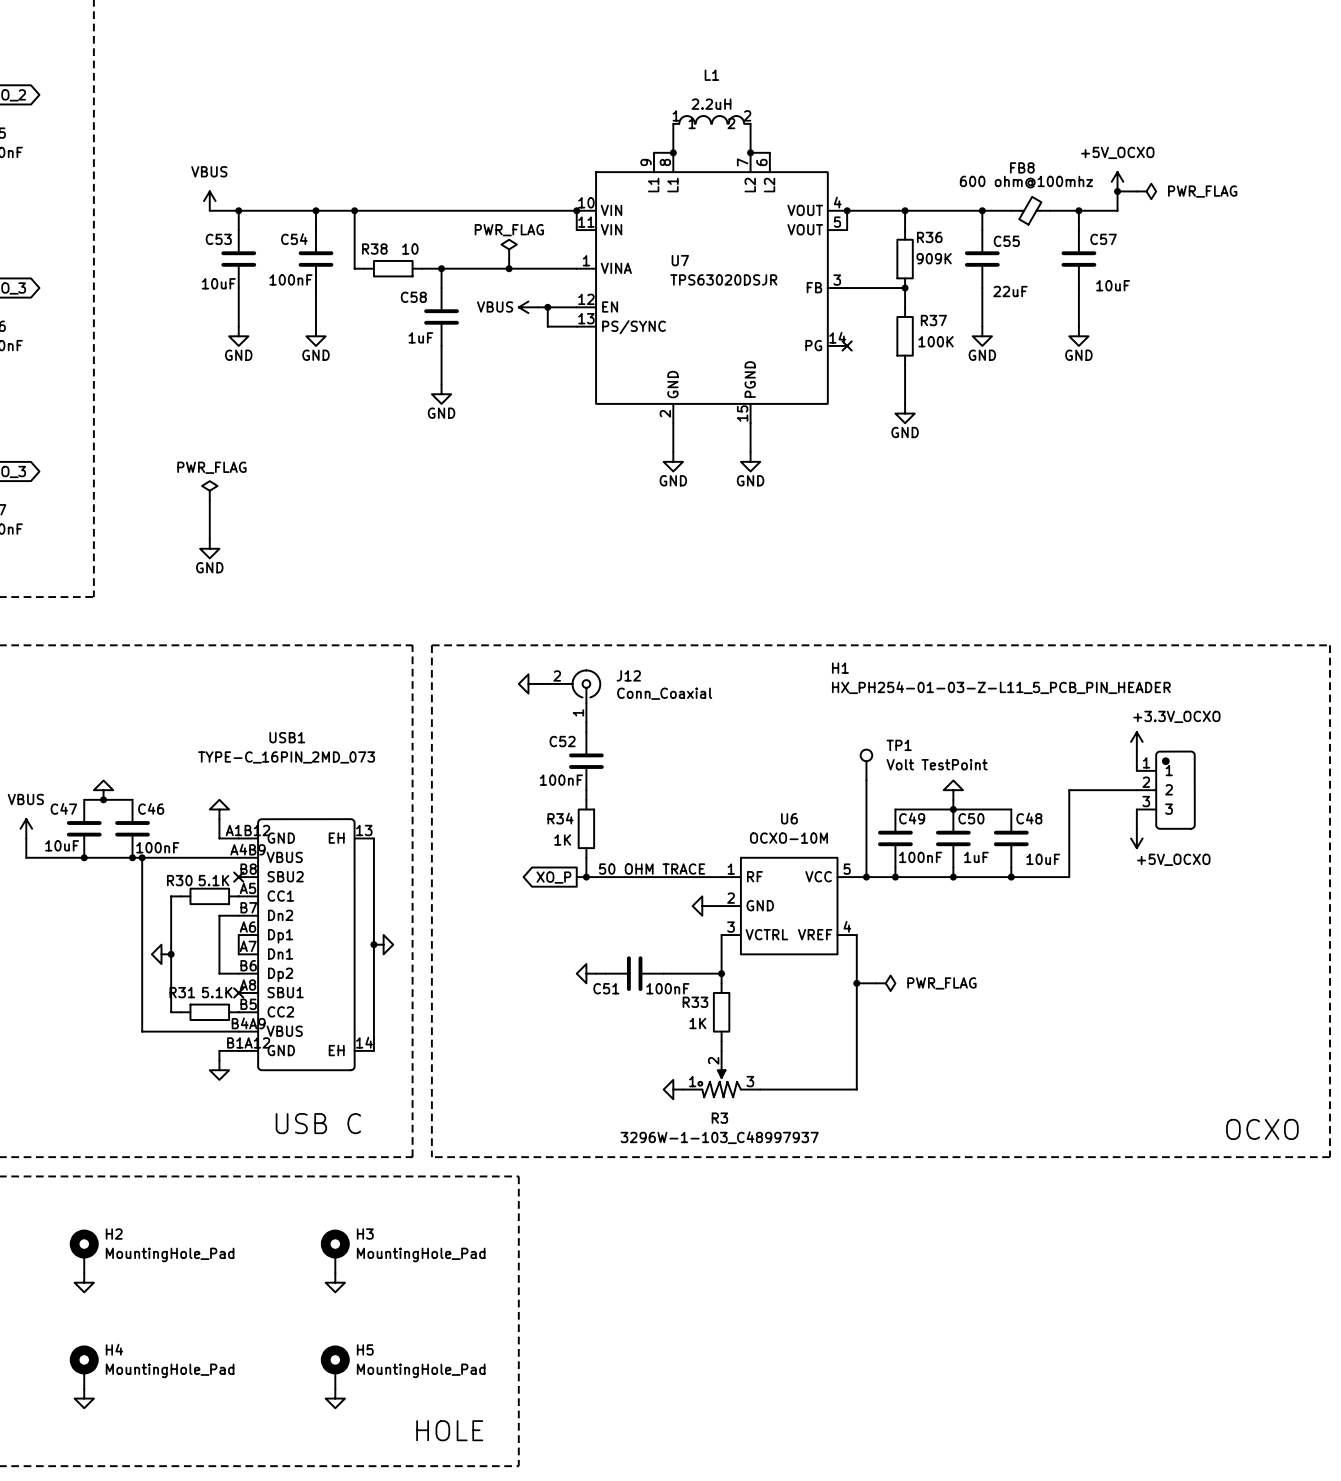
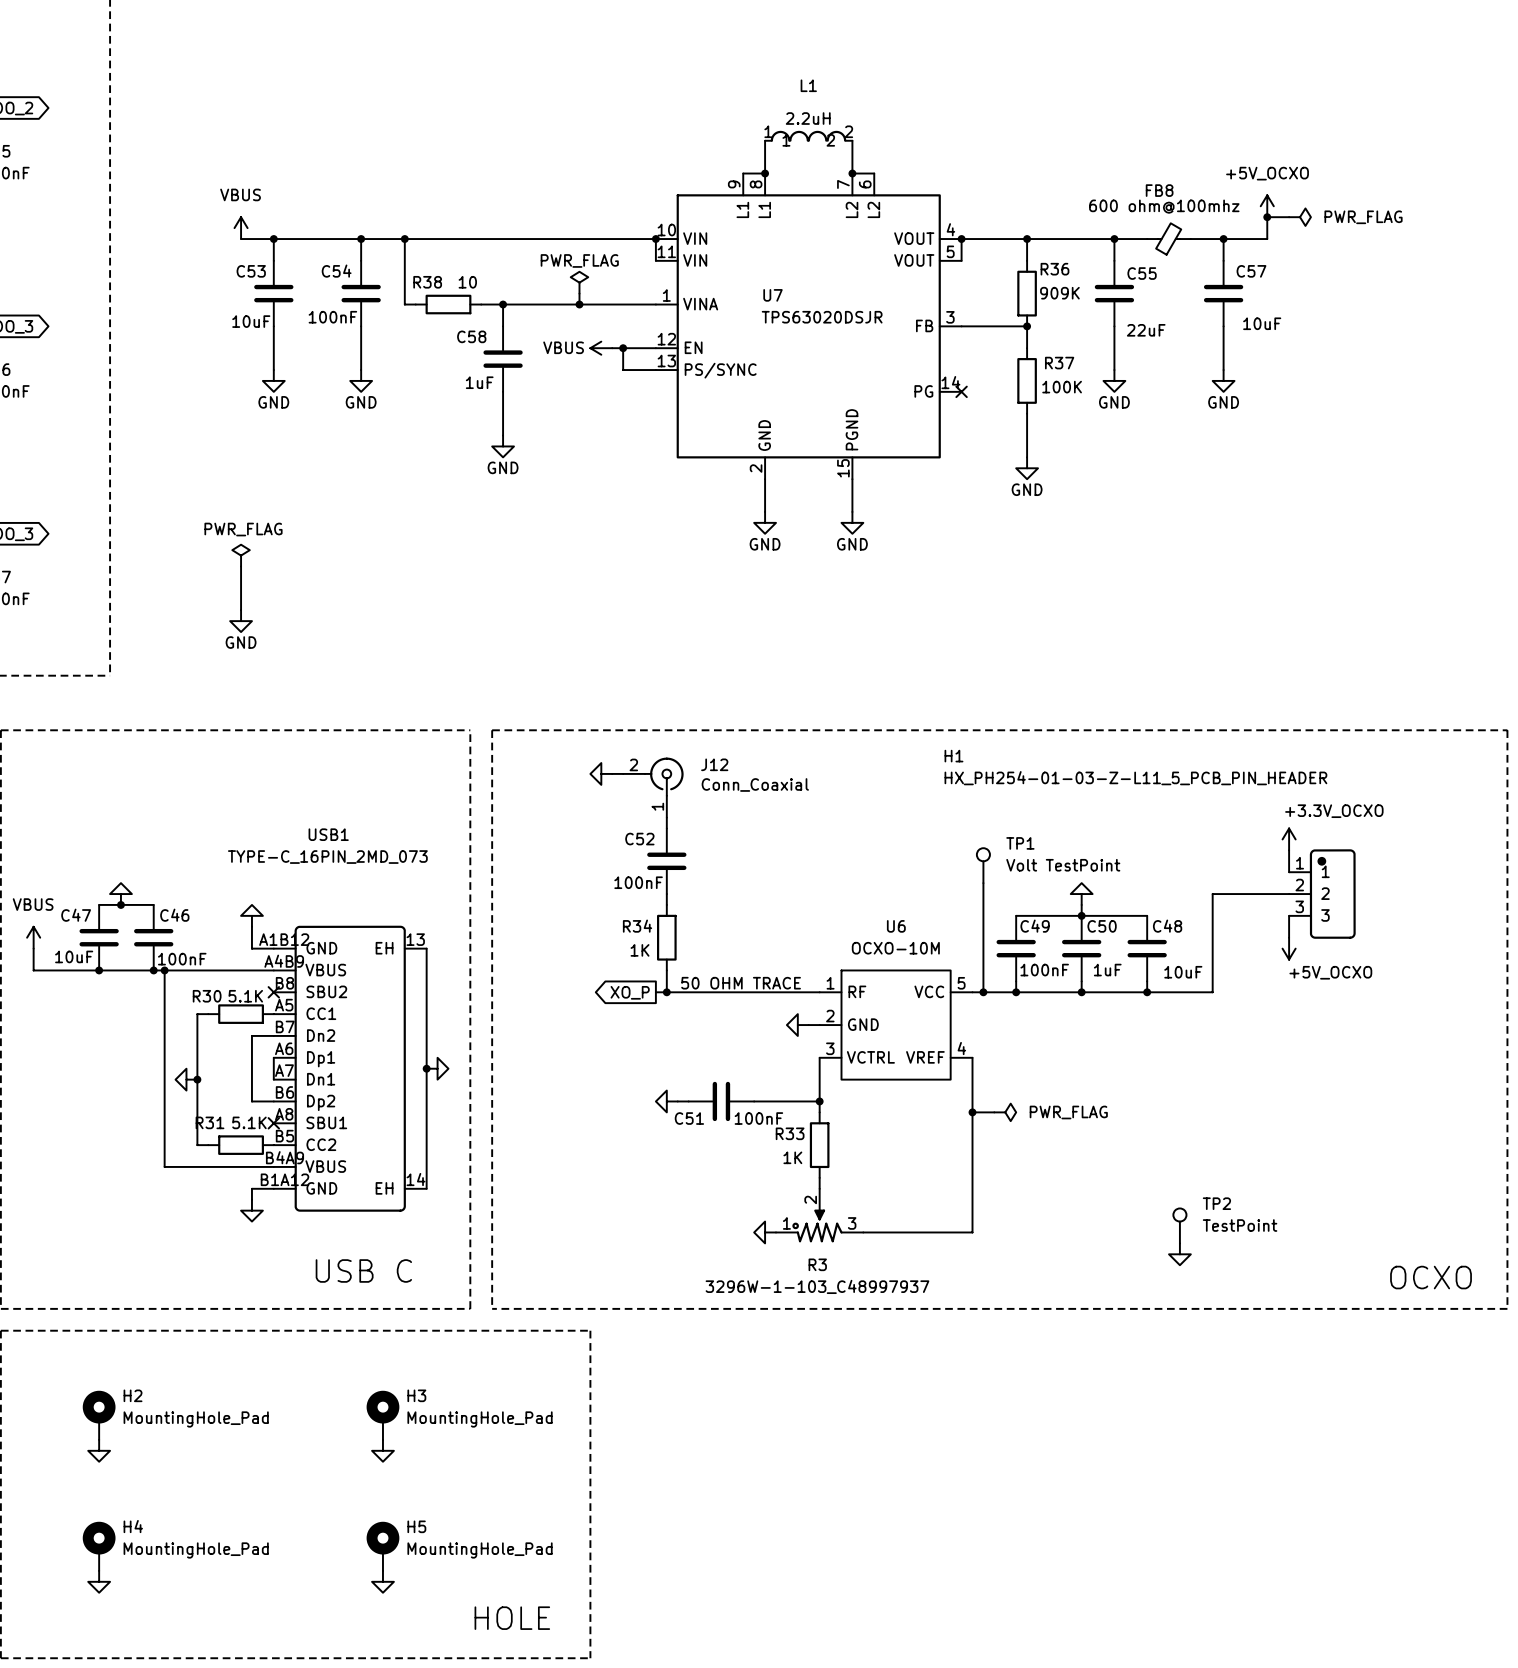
TP2: none -> TestPoint (1179, 1225)
power symbol: none -> (1179, 1254)

